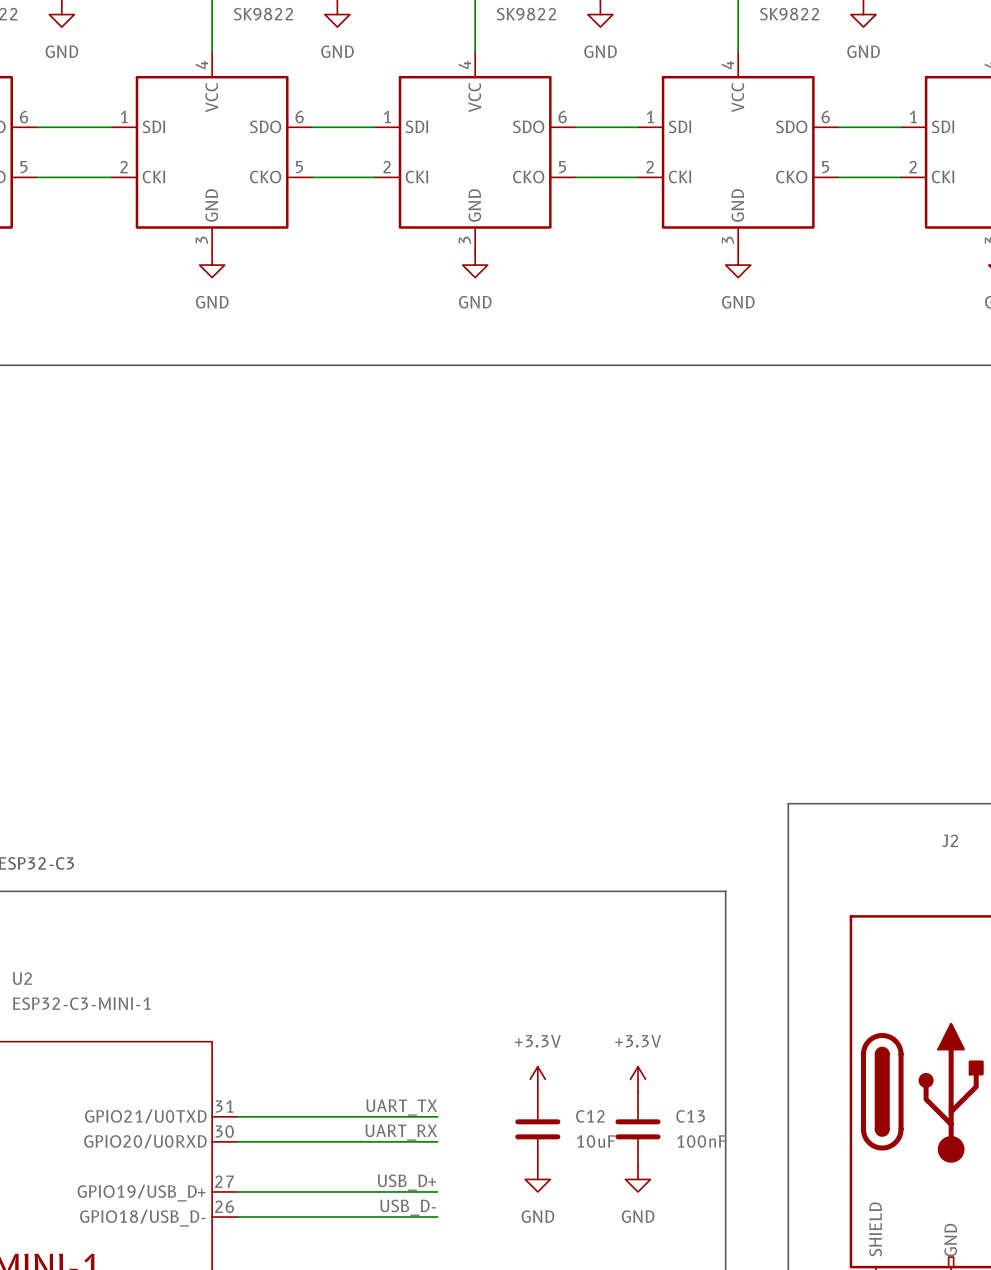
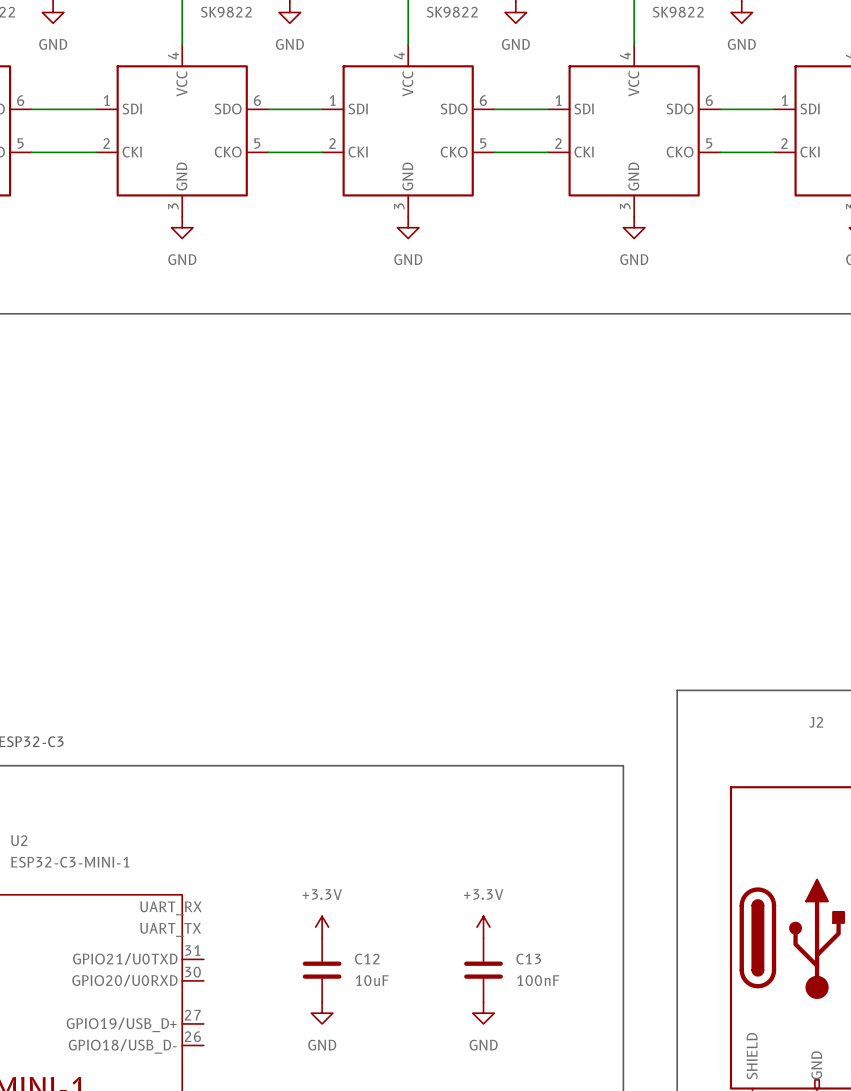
label: none -> UART_RX (170, 908)
power symbol: none -> +3.3V (322, 927)
power symbol position: +3.3V (537, 1079) -> +3.3V (483, 927)
power symbol: +3.3V (638, 1079) -> none
label: none -> UART_TX (170, 929)
label: UART_TX (401, 1107) -> none
wire: (237, 1116) (437, 1116) -> none
C12 position: (537, 1129) -> (322, 970)
C13 position: (638, 1129) -> (483, 970)
label: UART_RX (401, 1132) -> none
wire: (237, 1141) (437, 1141) -> none
power symbol: none -> GND (322, 1013)
power symbol position: GND (537, 1179) -> GND (483, 1013)
power symbol: GND (638, 1179) -> none
label: USB_D+ (406, 1182) -> none
wire: (237, 1191) (437, 1191) -> none
label: USB_D- (408, 1207) -> none
wire: (237, 1217) (437, 1217) -> none

